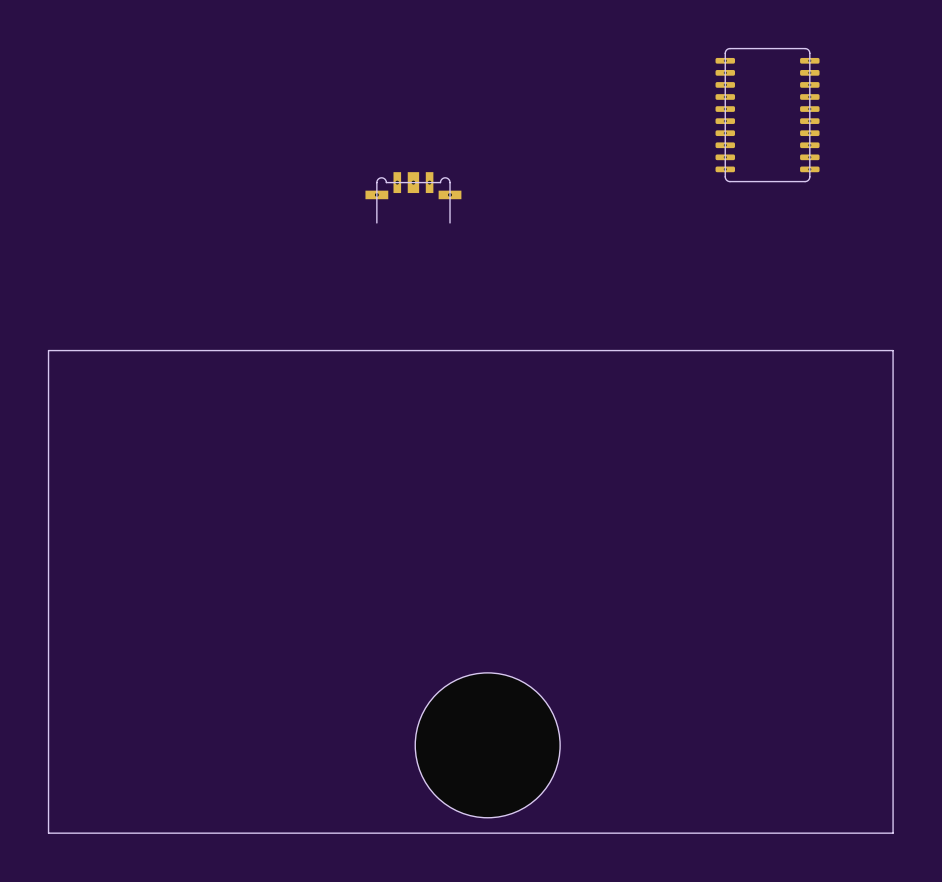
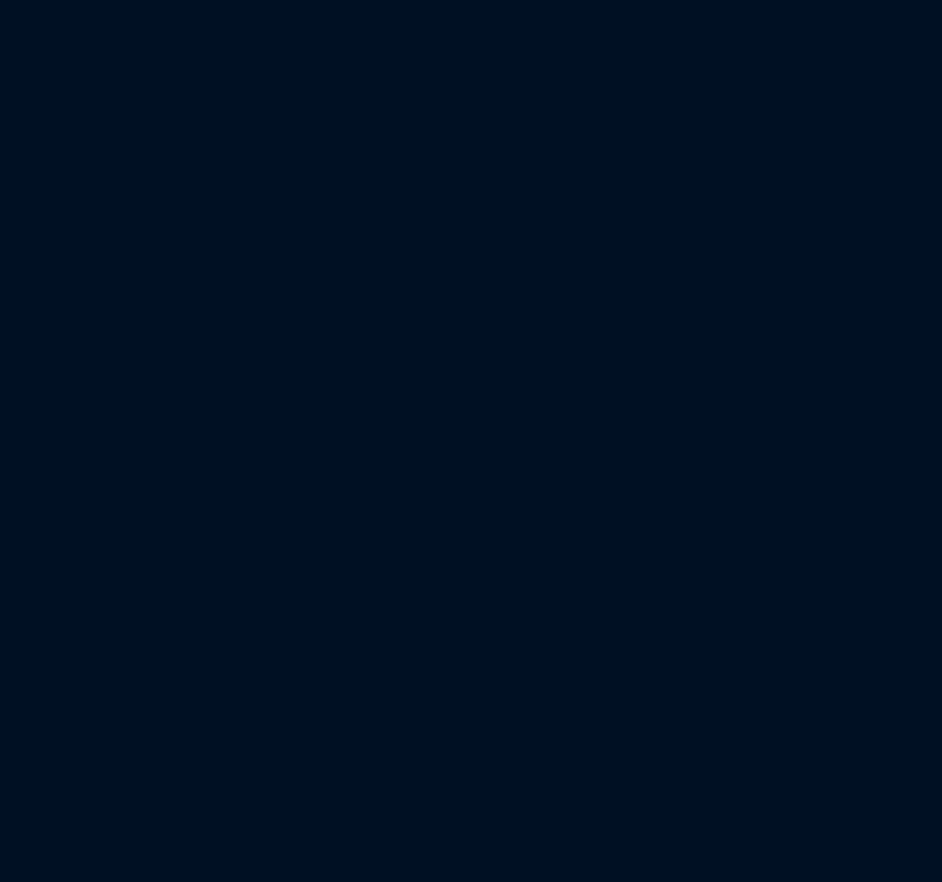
part: (767, 115) -> none
part: (413, 197) -> none
board edge: (893, 350) (893, 833) (48, 833) (48, 350) (893, 350) -> none
part: (487, 745) -> none

